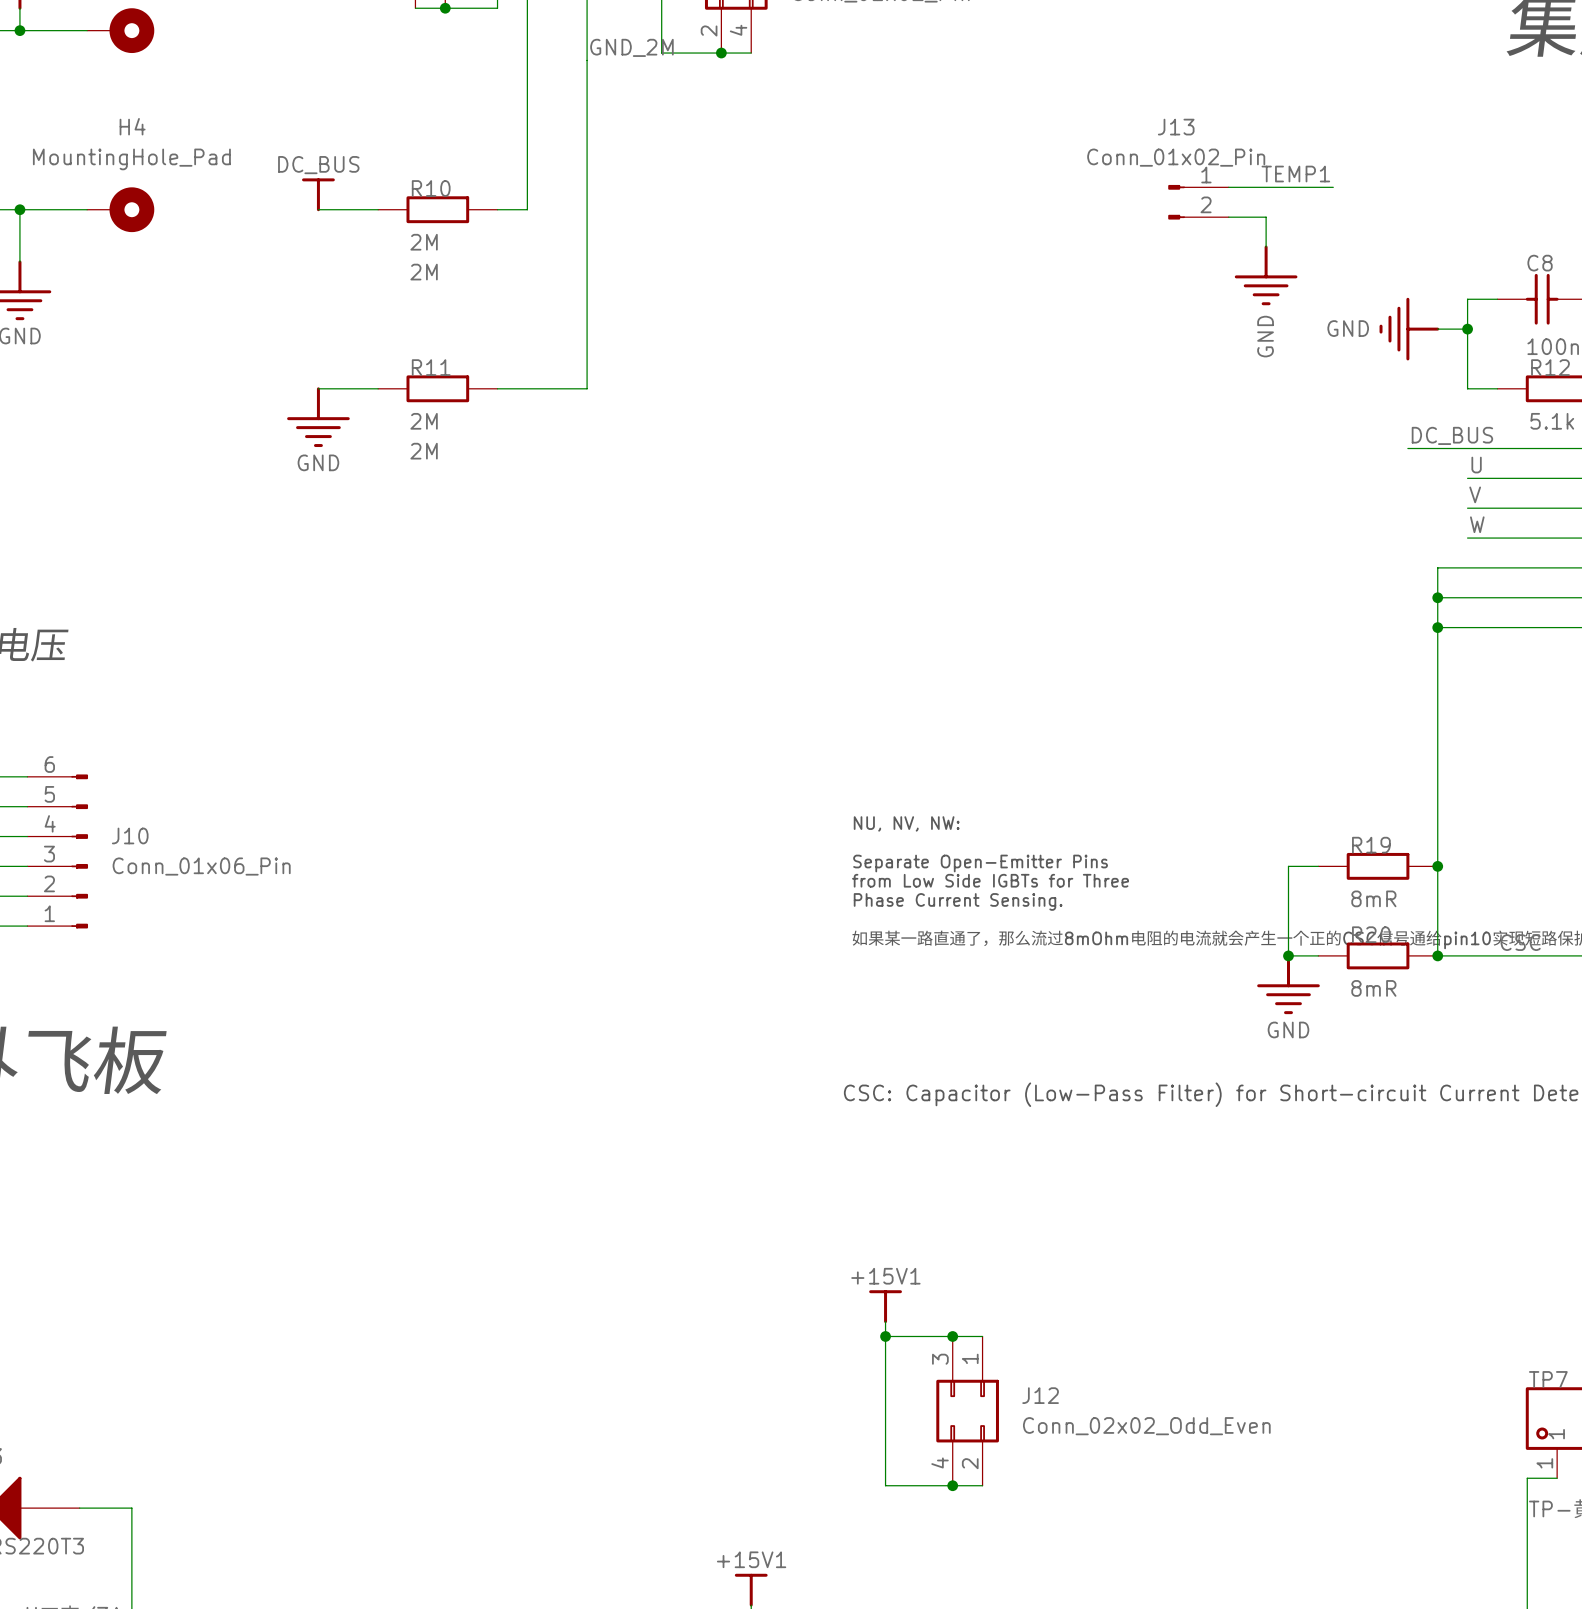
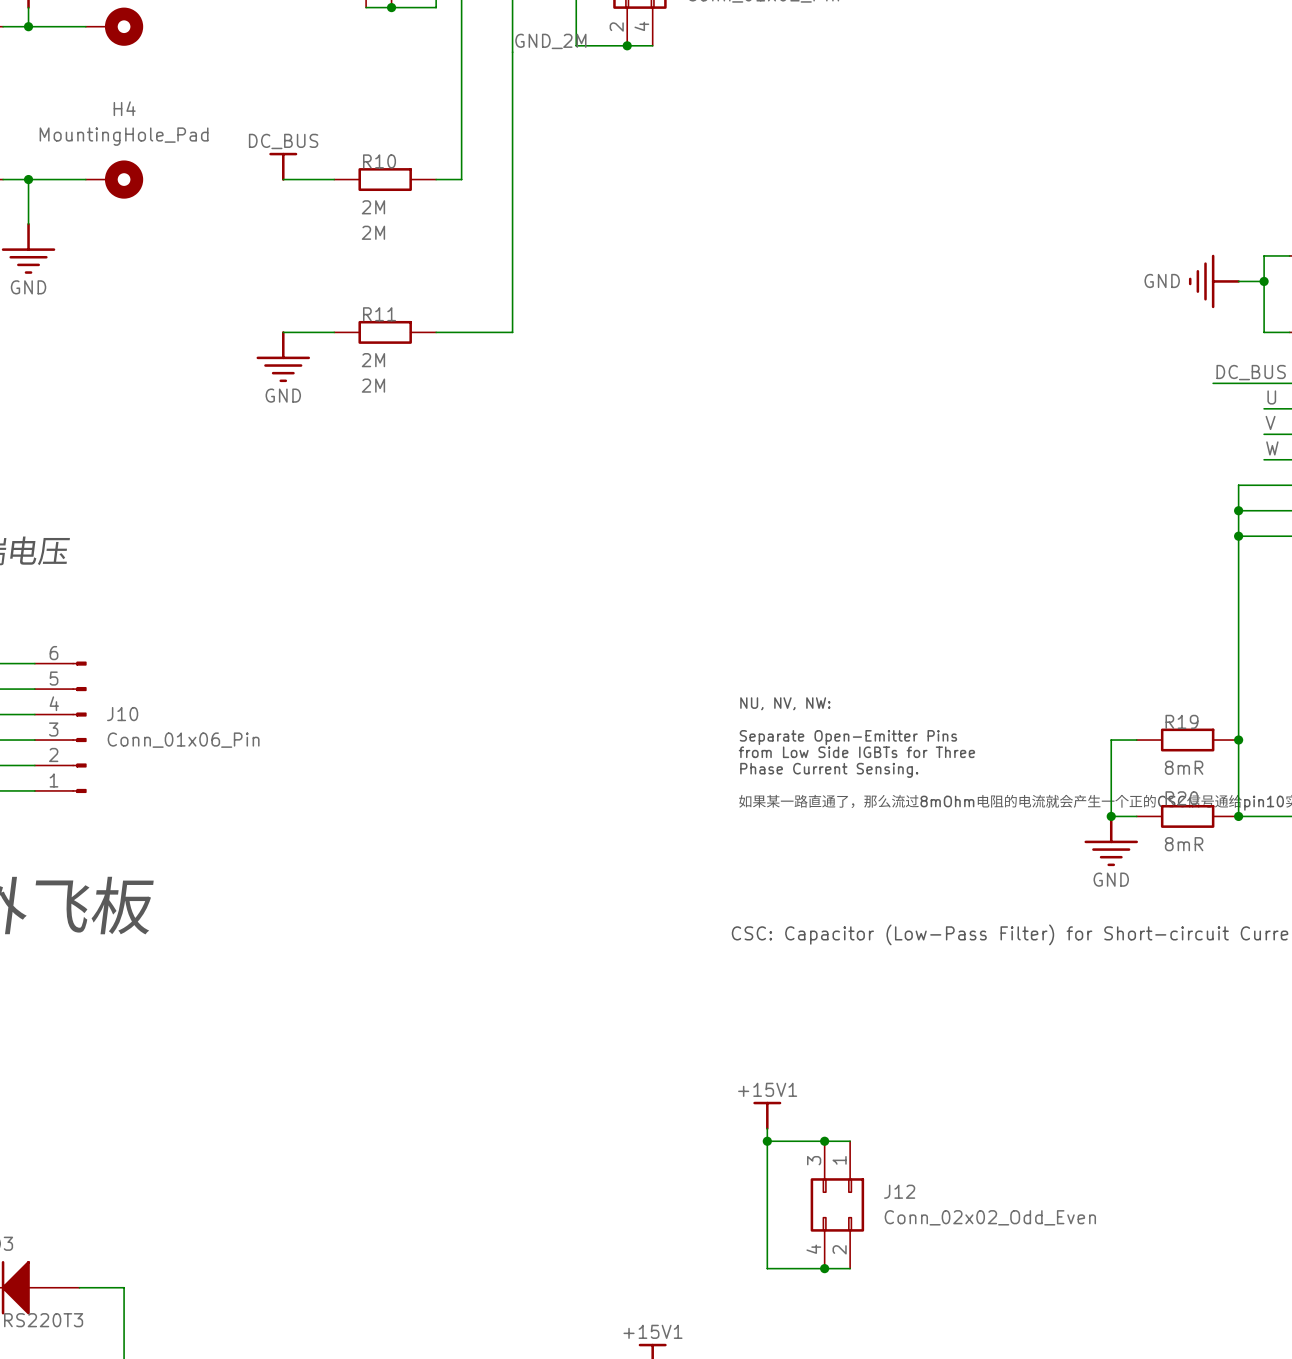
label: TEMP1 (1295, 174) -> none
wire: (1228, 187) (1333, 187) -> none
J13: Conn_01x02_Pin (1198, 202) -> none
wire: (1228, 217) (1266, 217) (1266, 247) -> none
power symbol: GND (1266, 275) -> none

